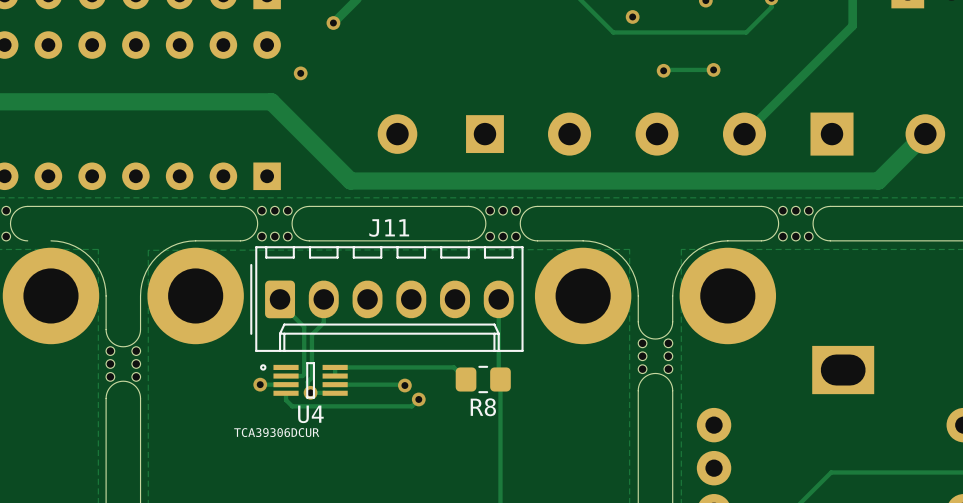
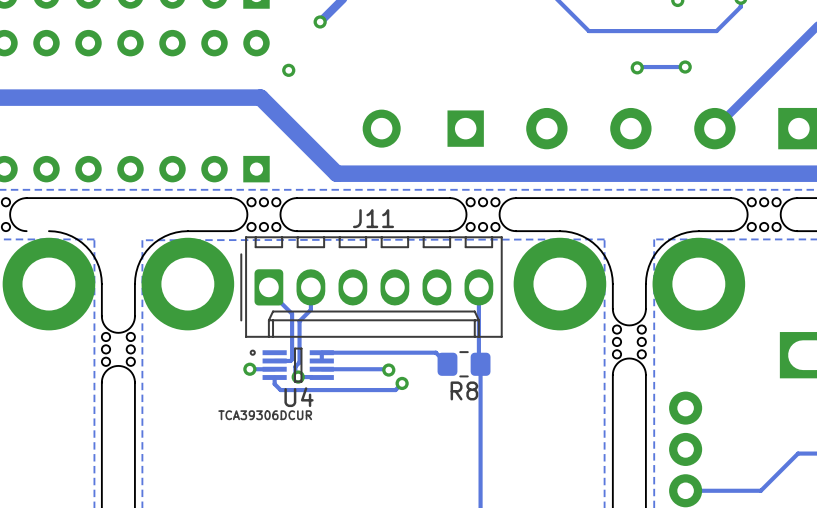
via: (632, 16) -> none

